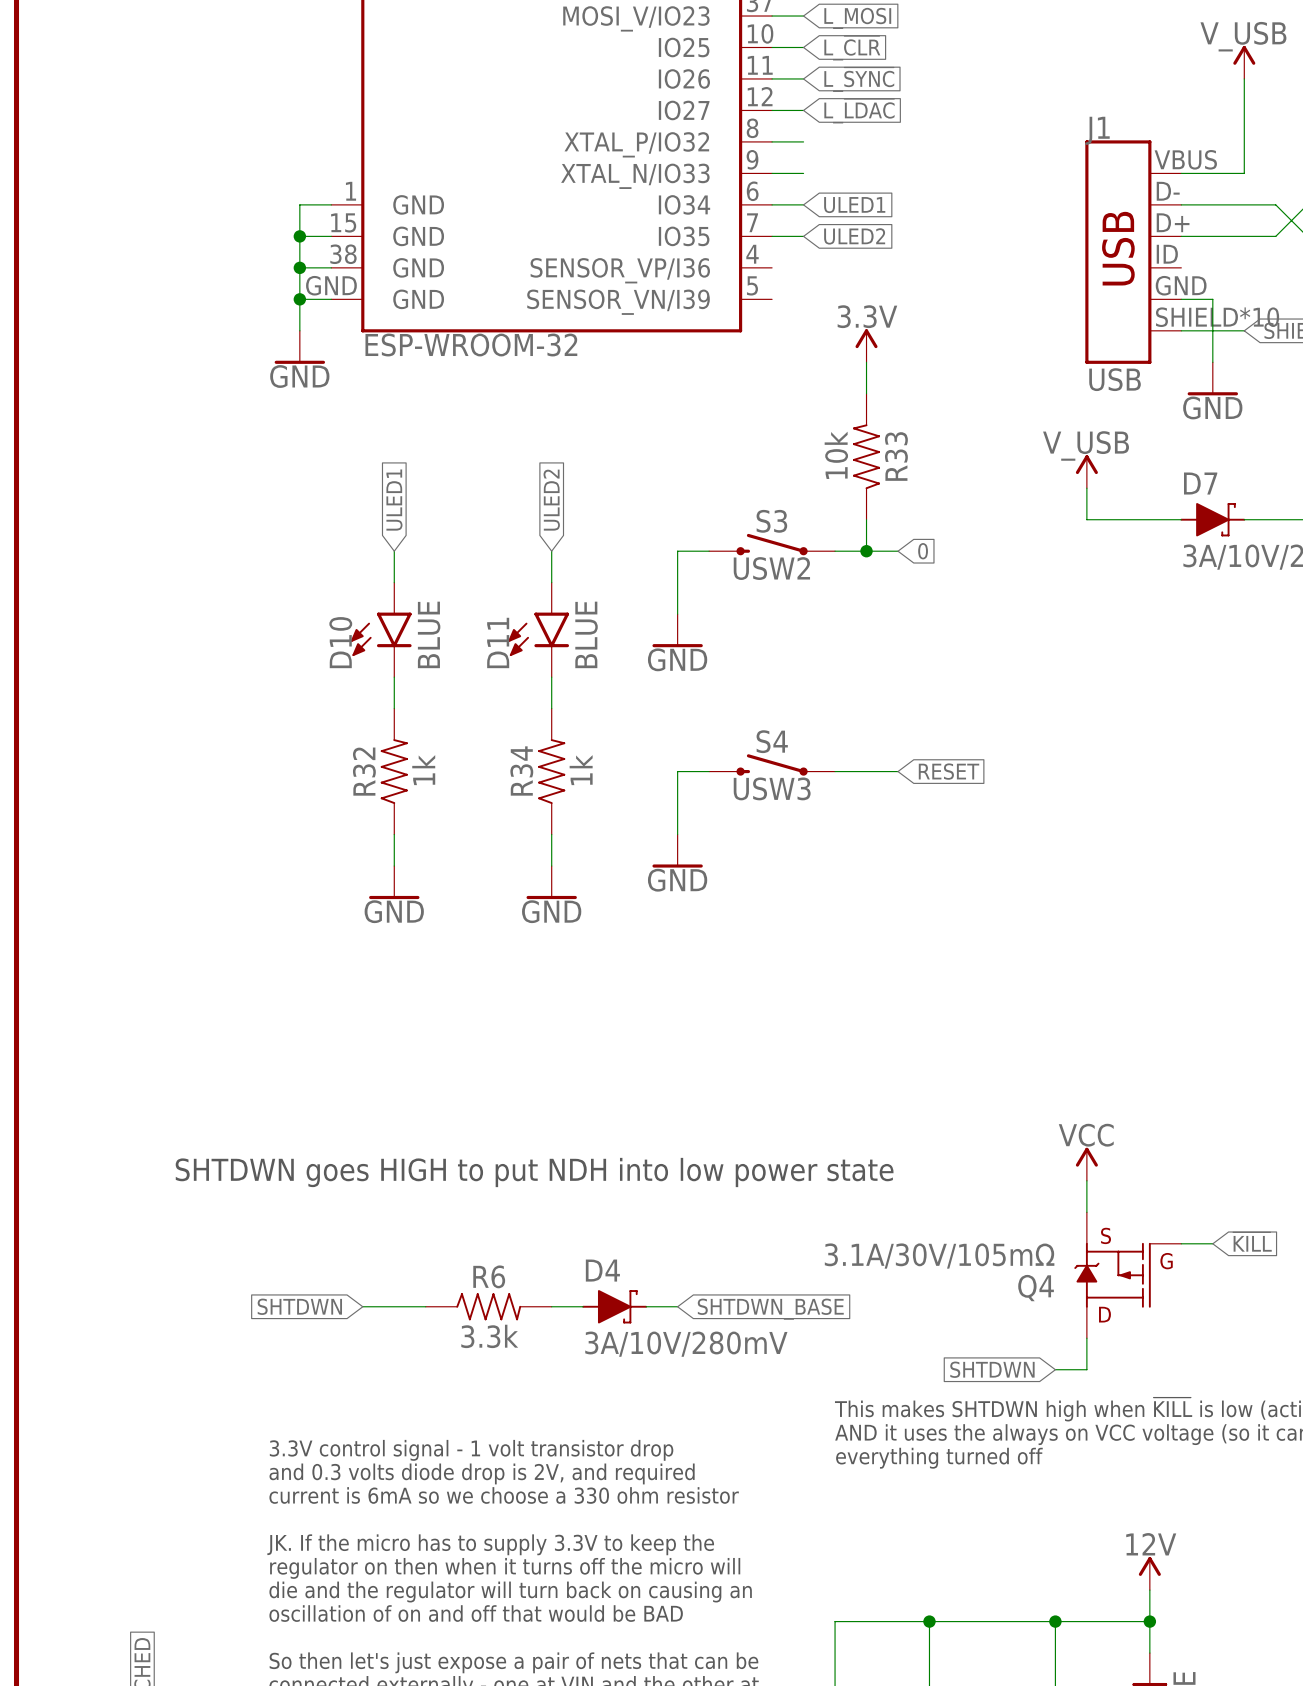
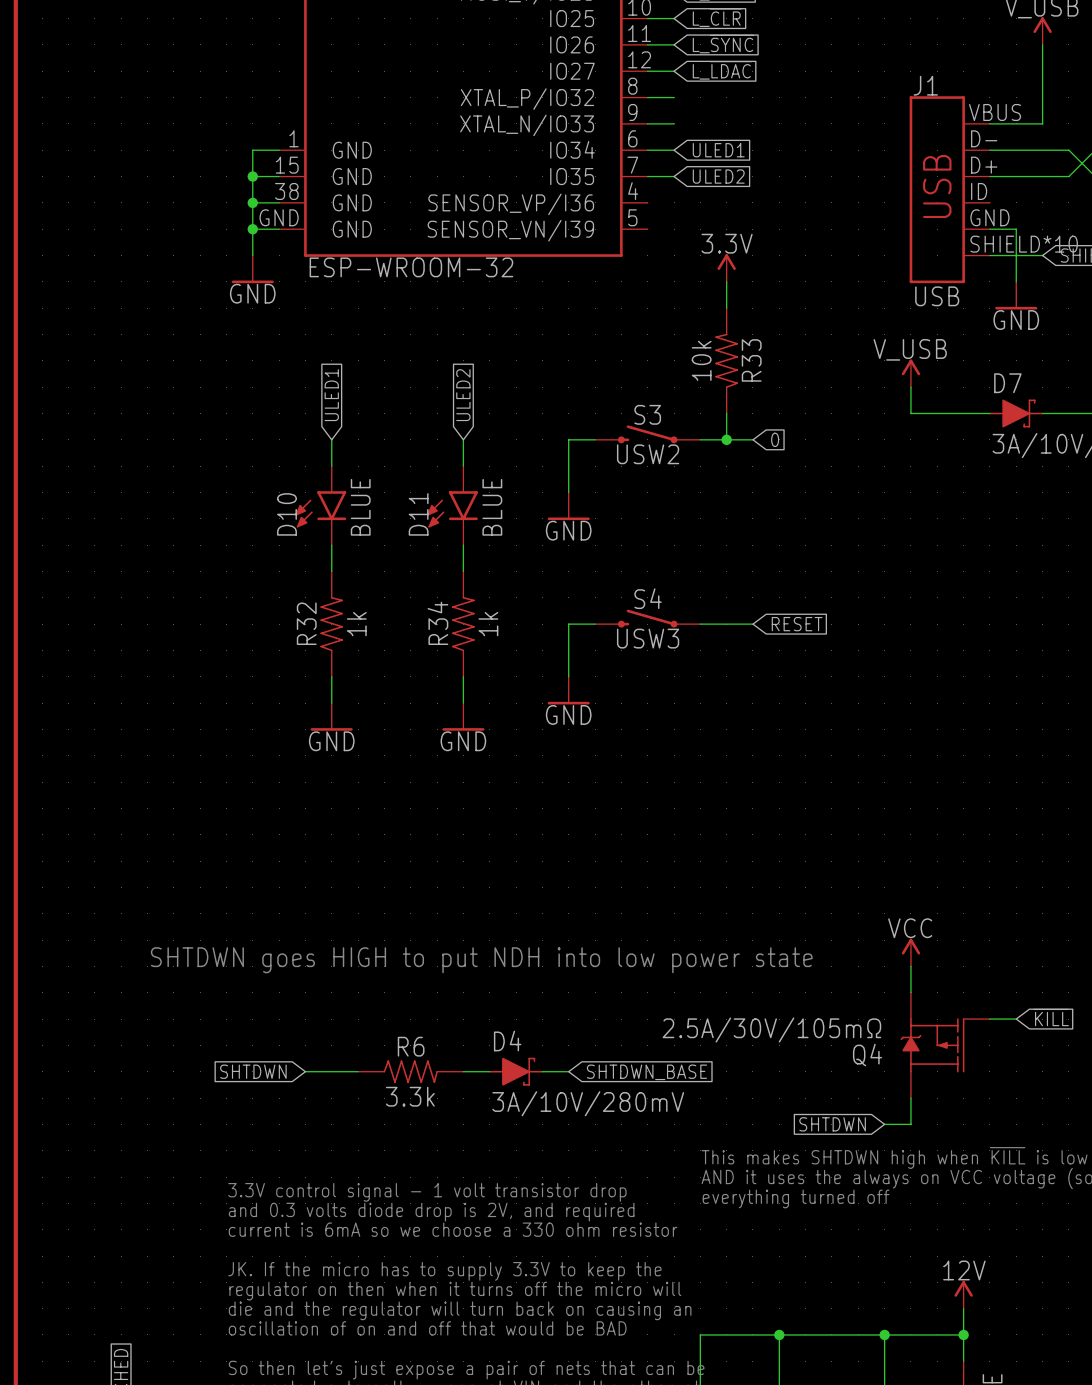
Q4 text: S (1106, 1235) -> none
Q4 value: 3.1A/30V/105mΩ (939, 1256) -> 2.5A/30V/105mΩ (771, 1030)
Q4 text: G (1166, 1261) -> none
Q4 text: D (1104, 1314) -> none

